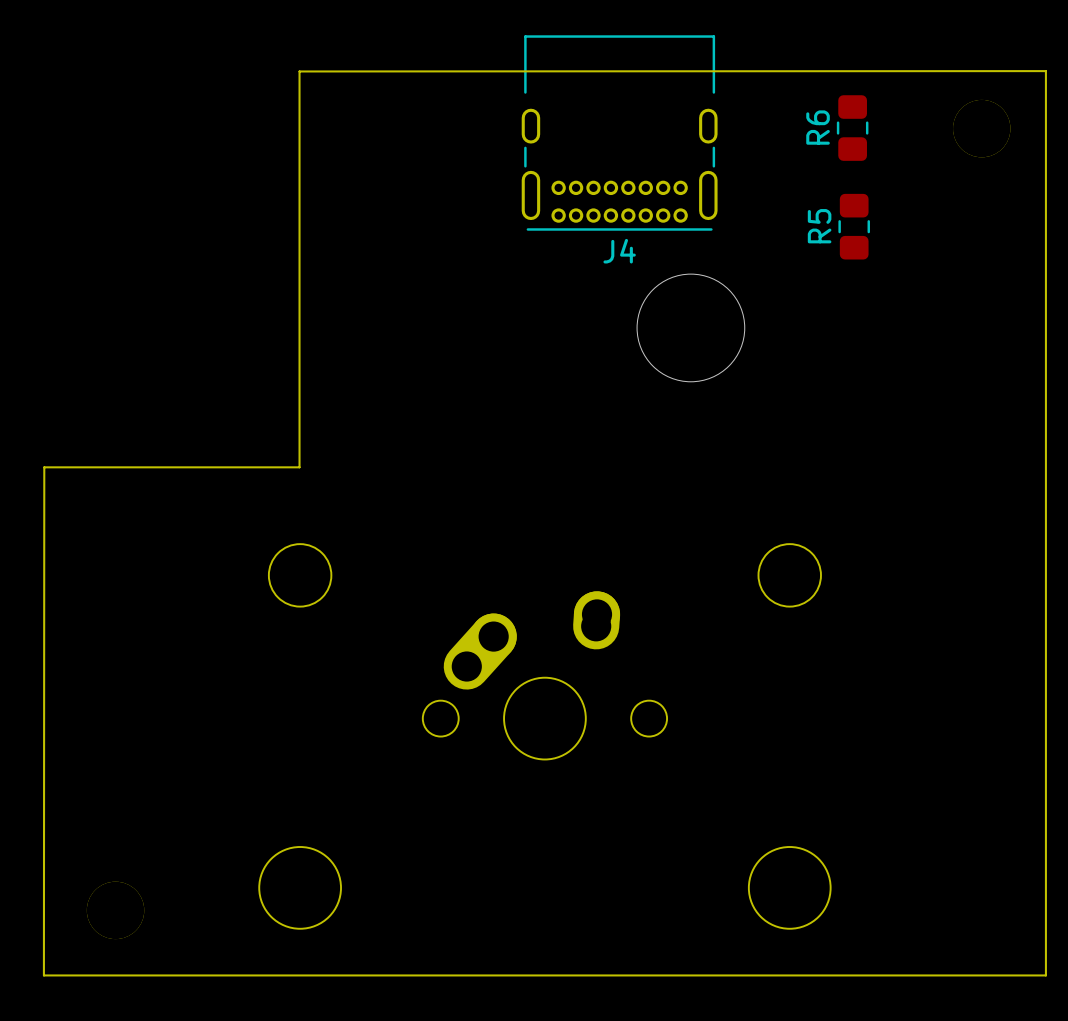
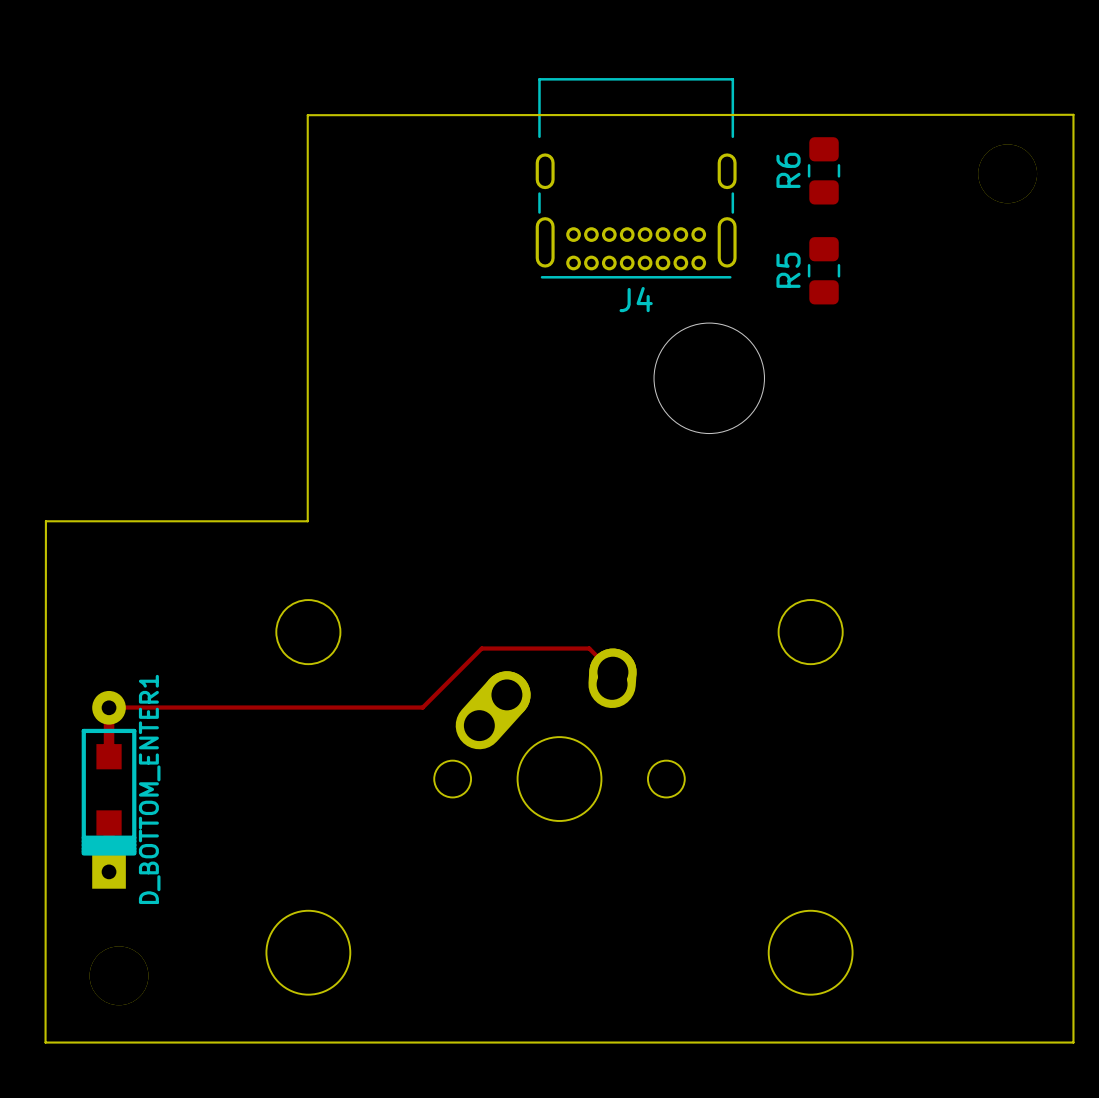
R6 position: (852, 128) -> (824, 170)
R5 position: (854, 226) -> (824, 270)
track: none -> (612, 672) (589, 648) (481, 648) (422, 707) (119, 707)
D_BOTTOM_ENTER1: none -> (109, 789)

